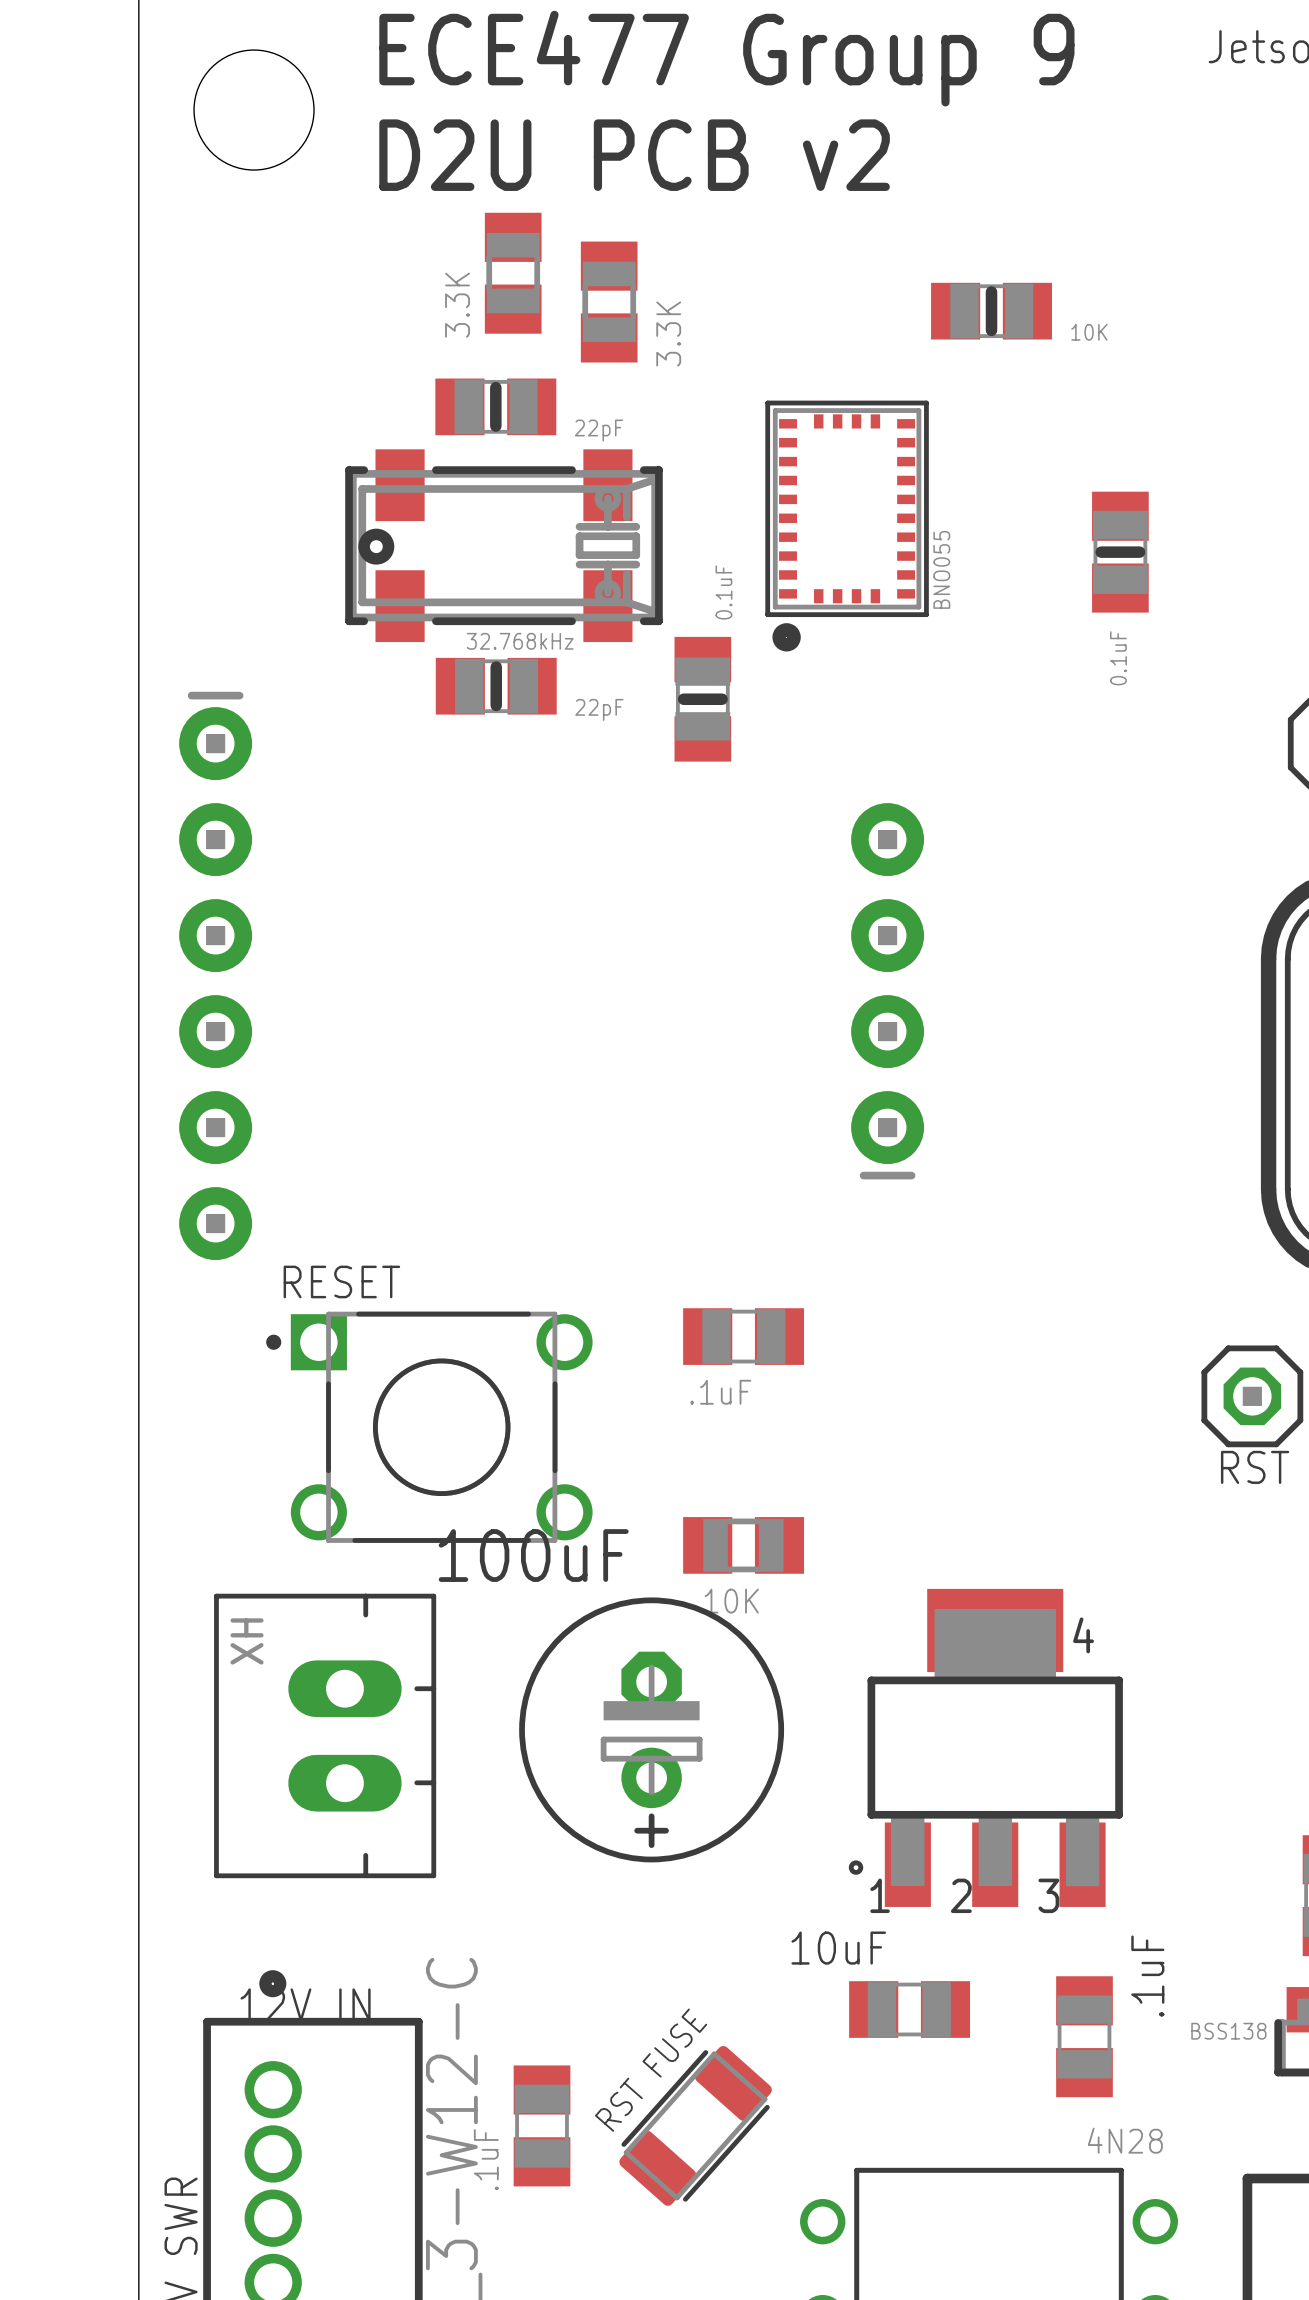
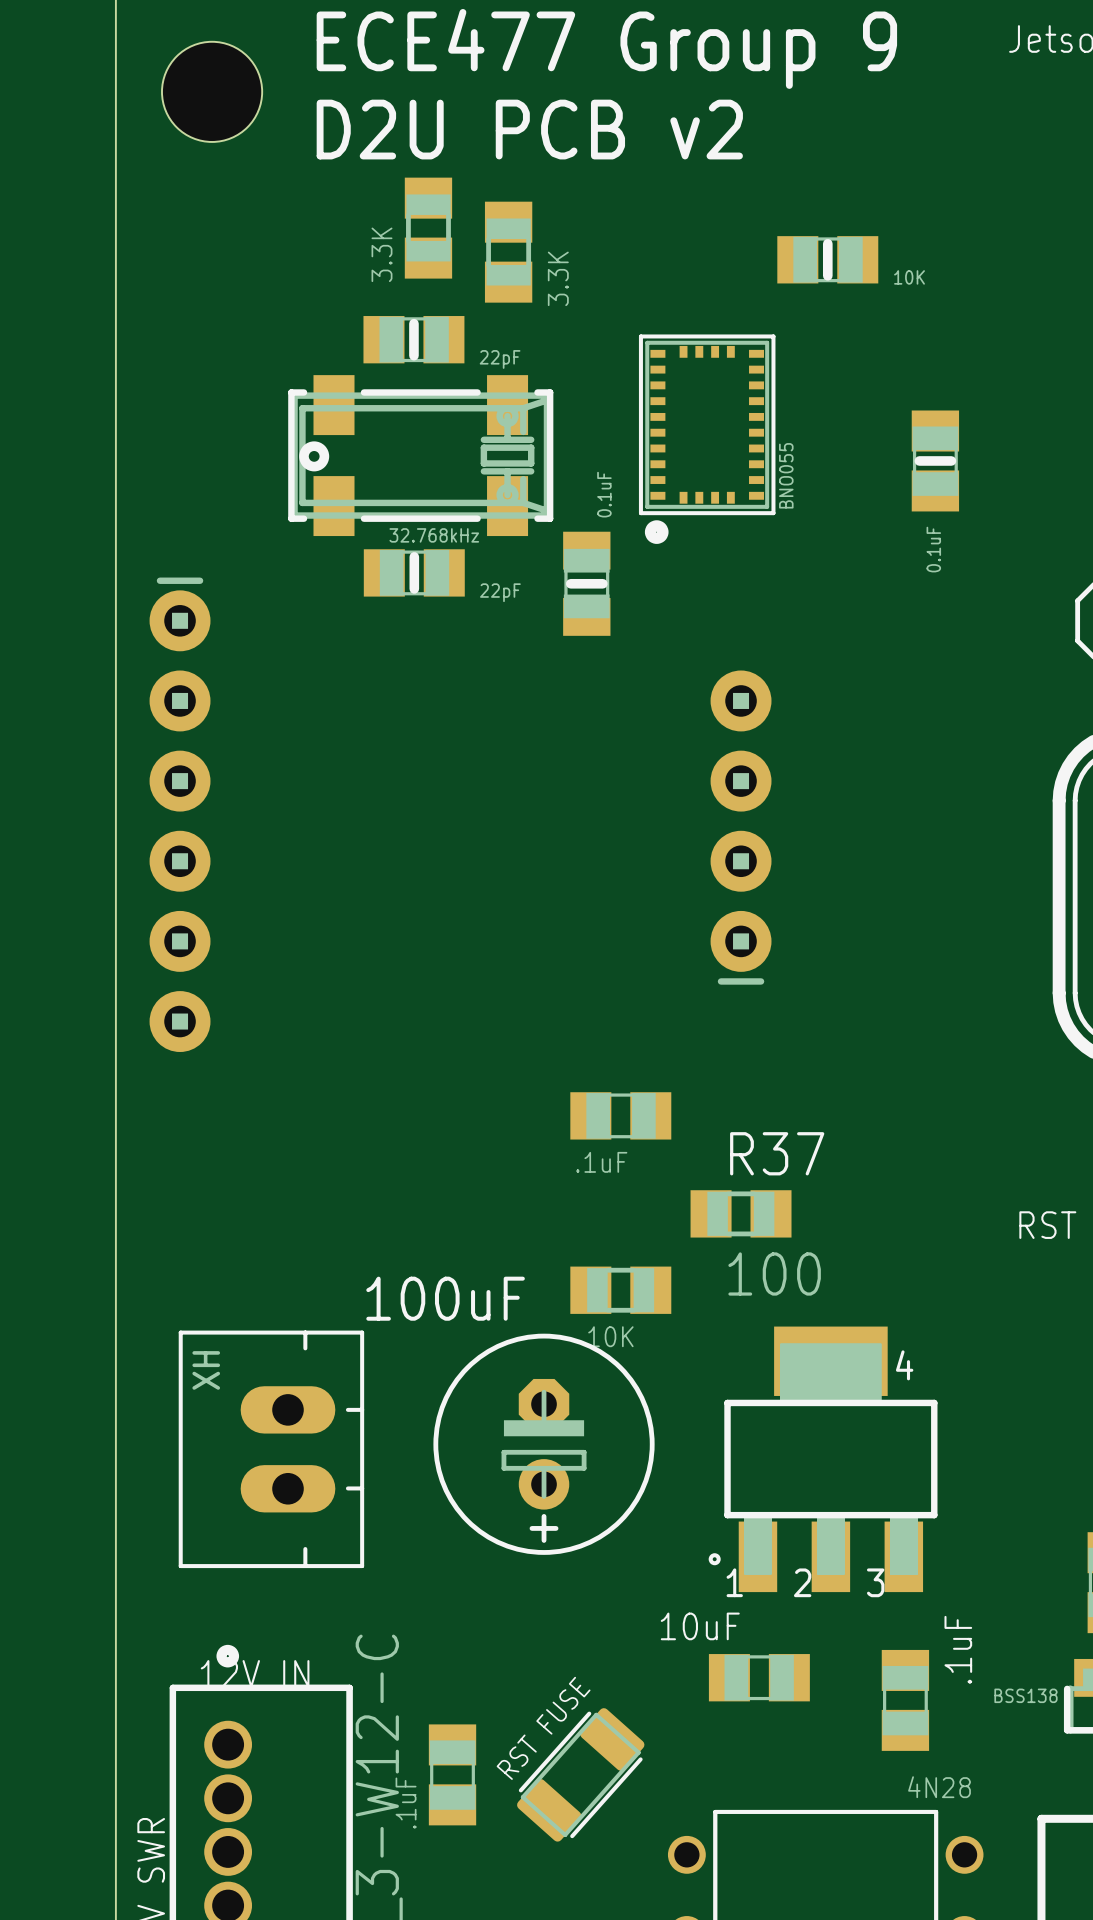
part: (1252, 1396) -> none
RESET: (429, 1427) -> none
R37: none -> 100 (741, 1213)

